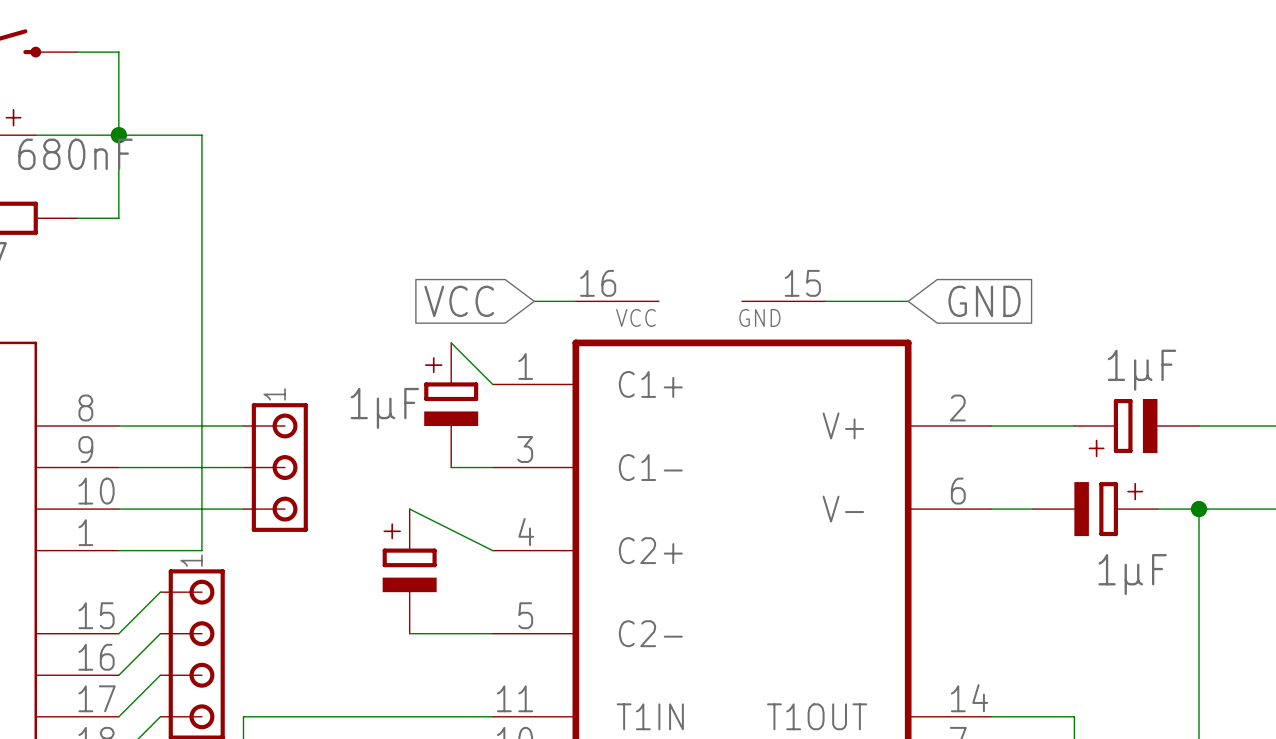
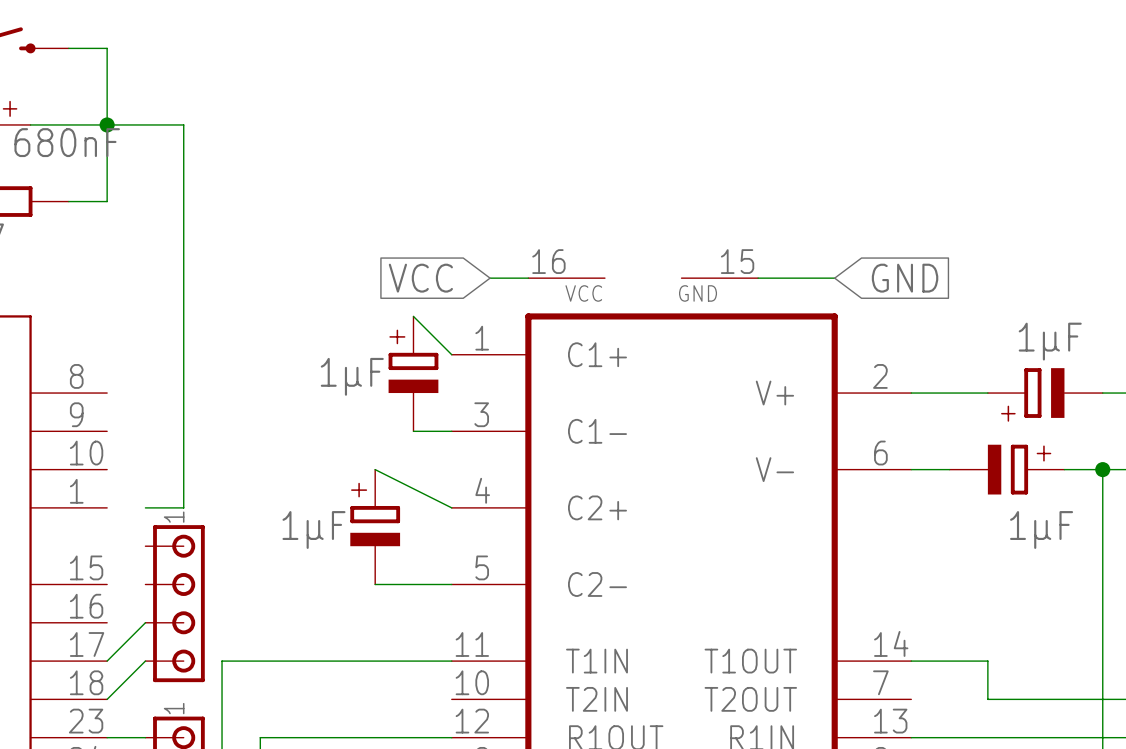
wire: (118, 425) (243, 425) -> none
wire: (118, 467) (243, 467) -> none
part: (275, 467) -> none
wire: (118, 509) (243, 509) -> none
wire: (118, 550) (160, 550) -> none
part value: none -> 1µF (313, 529)
wire: (160, 592) (118, 633) -> none
wire: (160, 633) (118, 675) -> none

